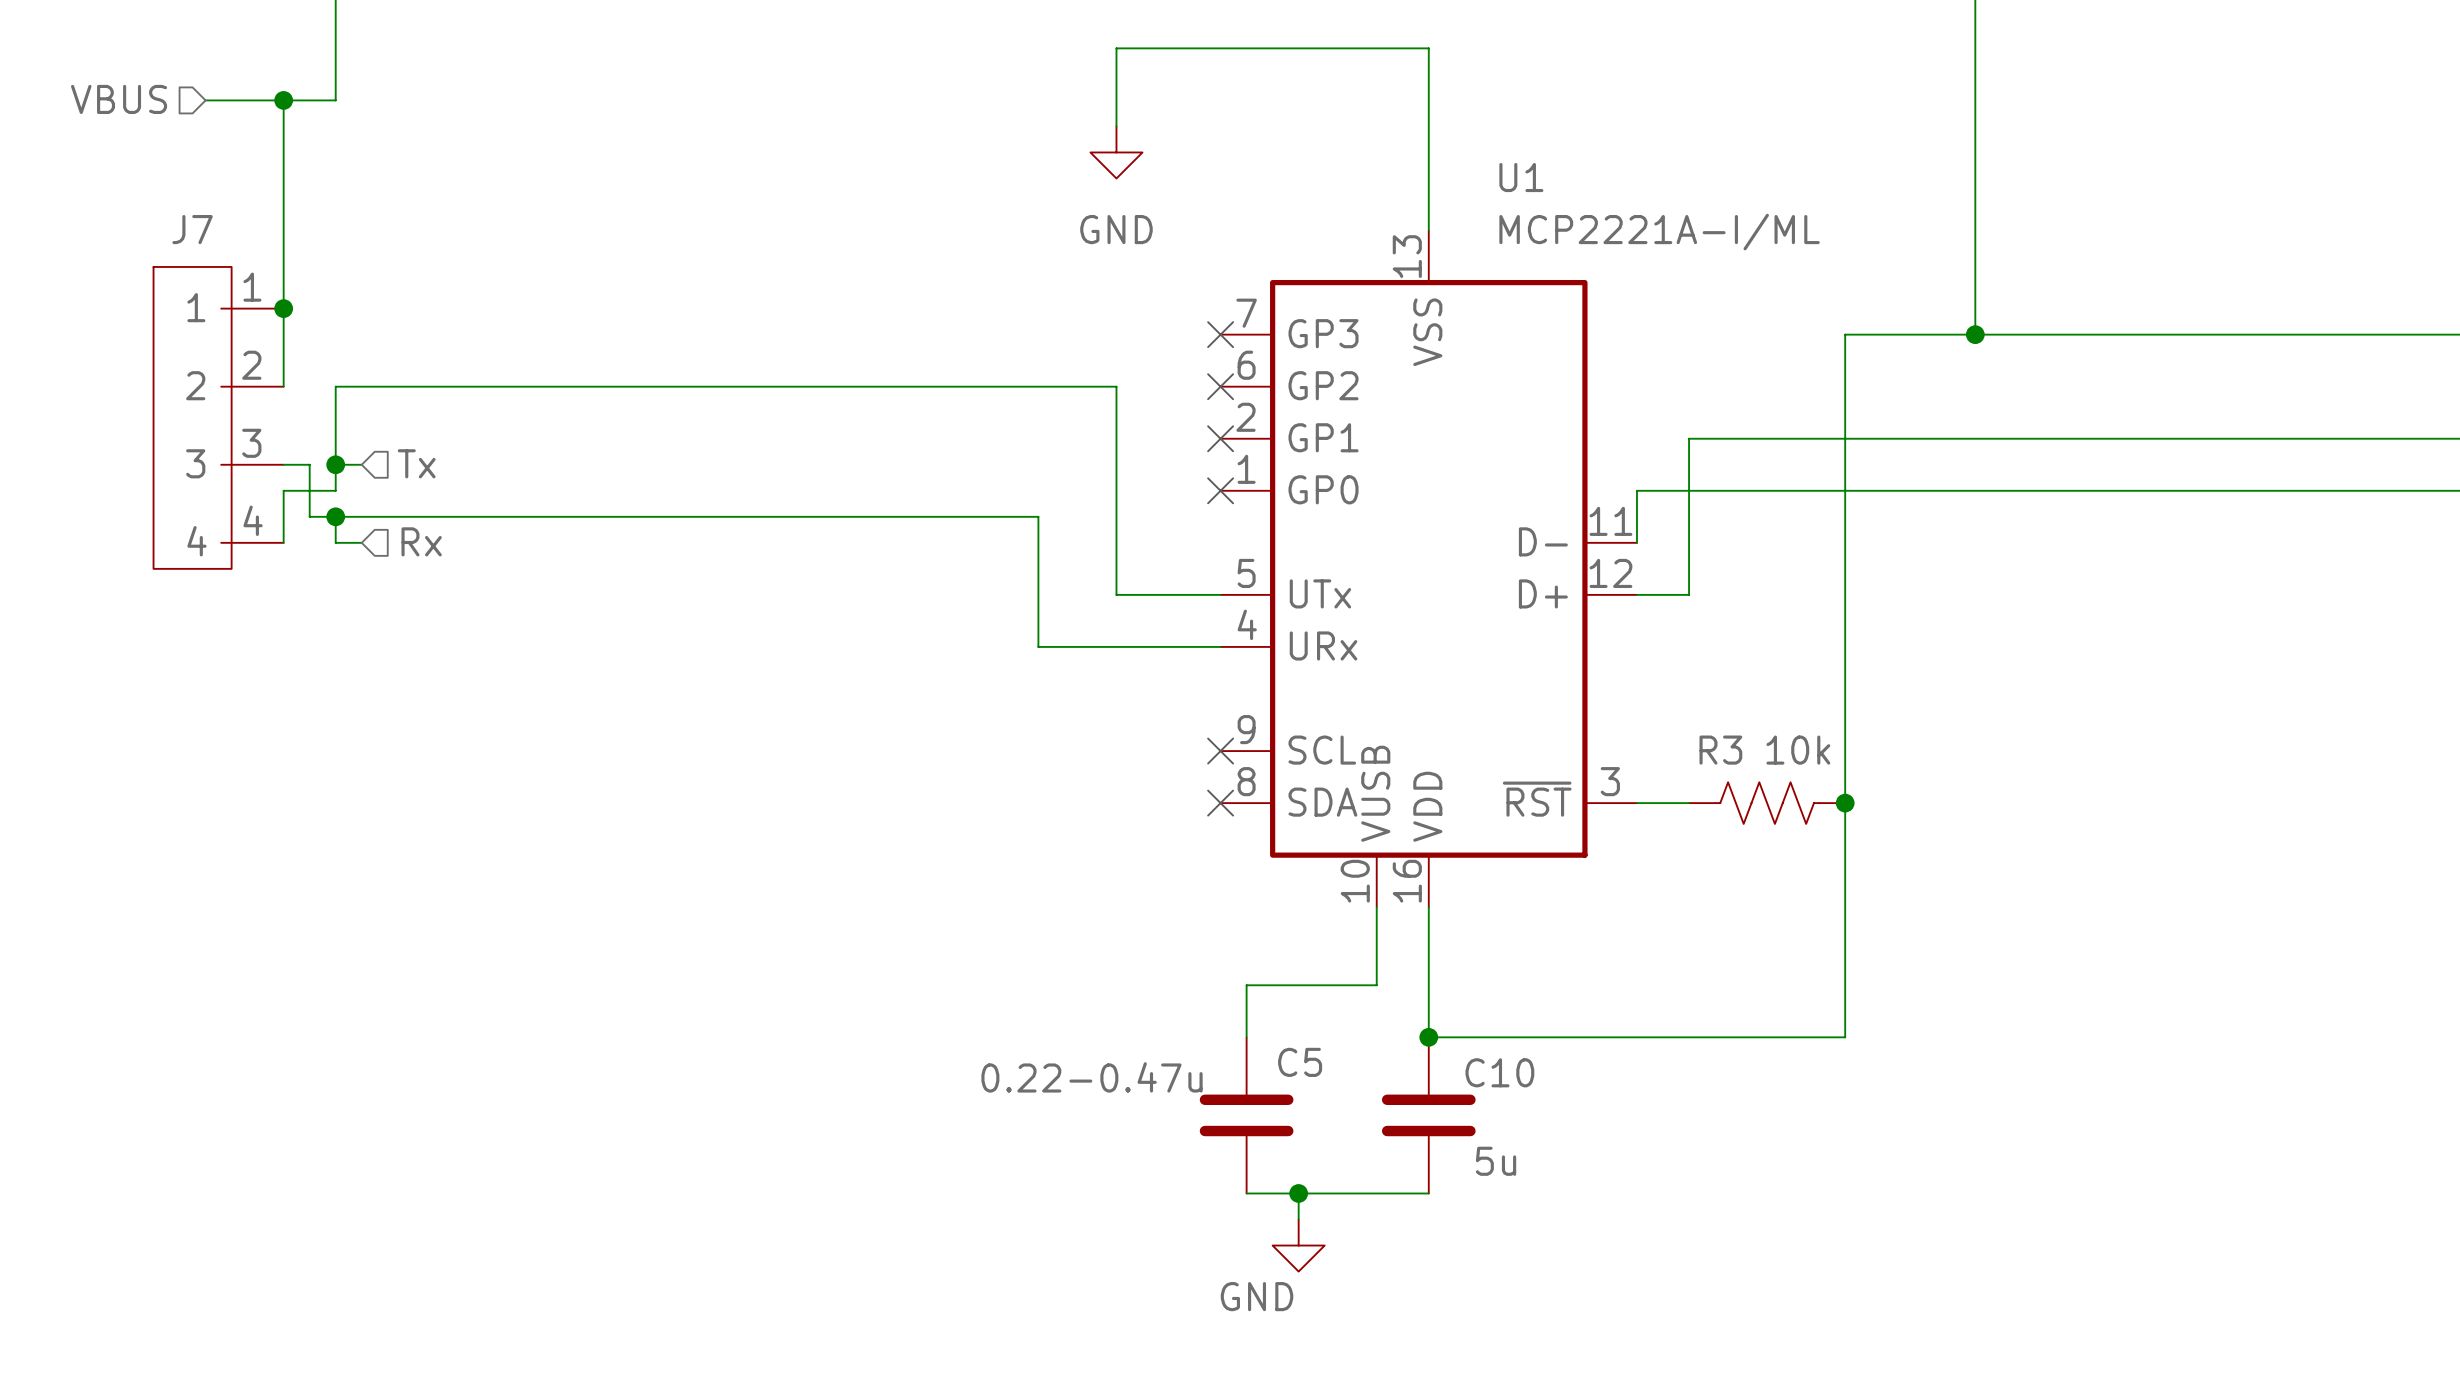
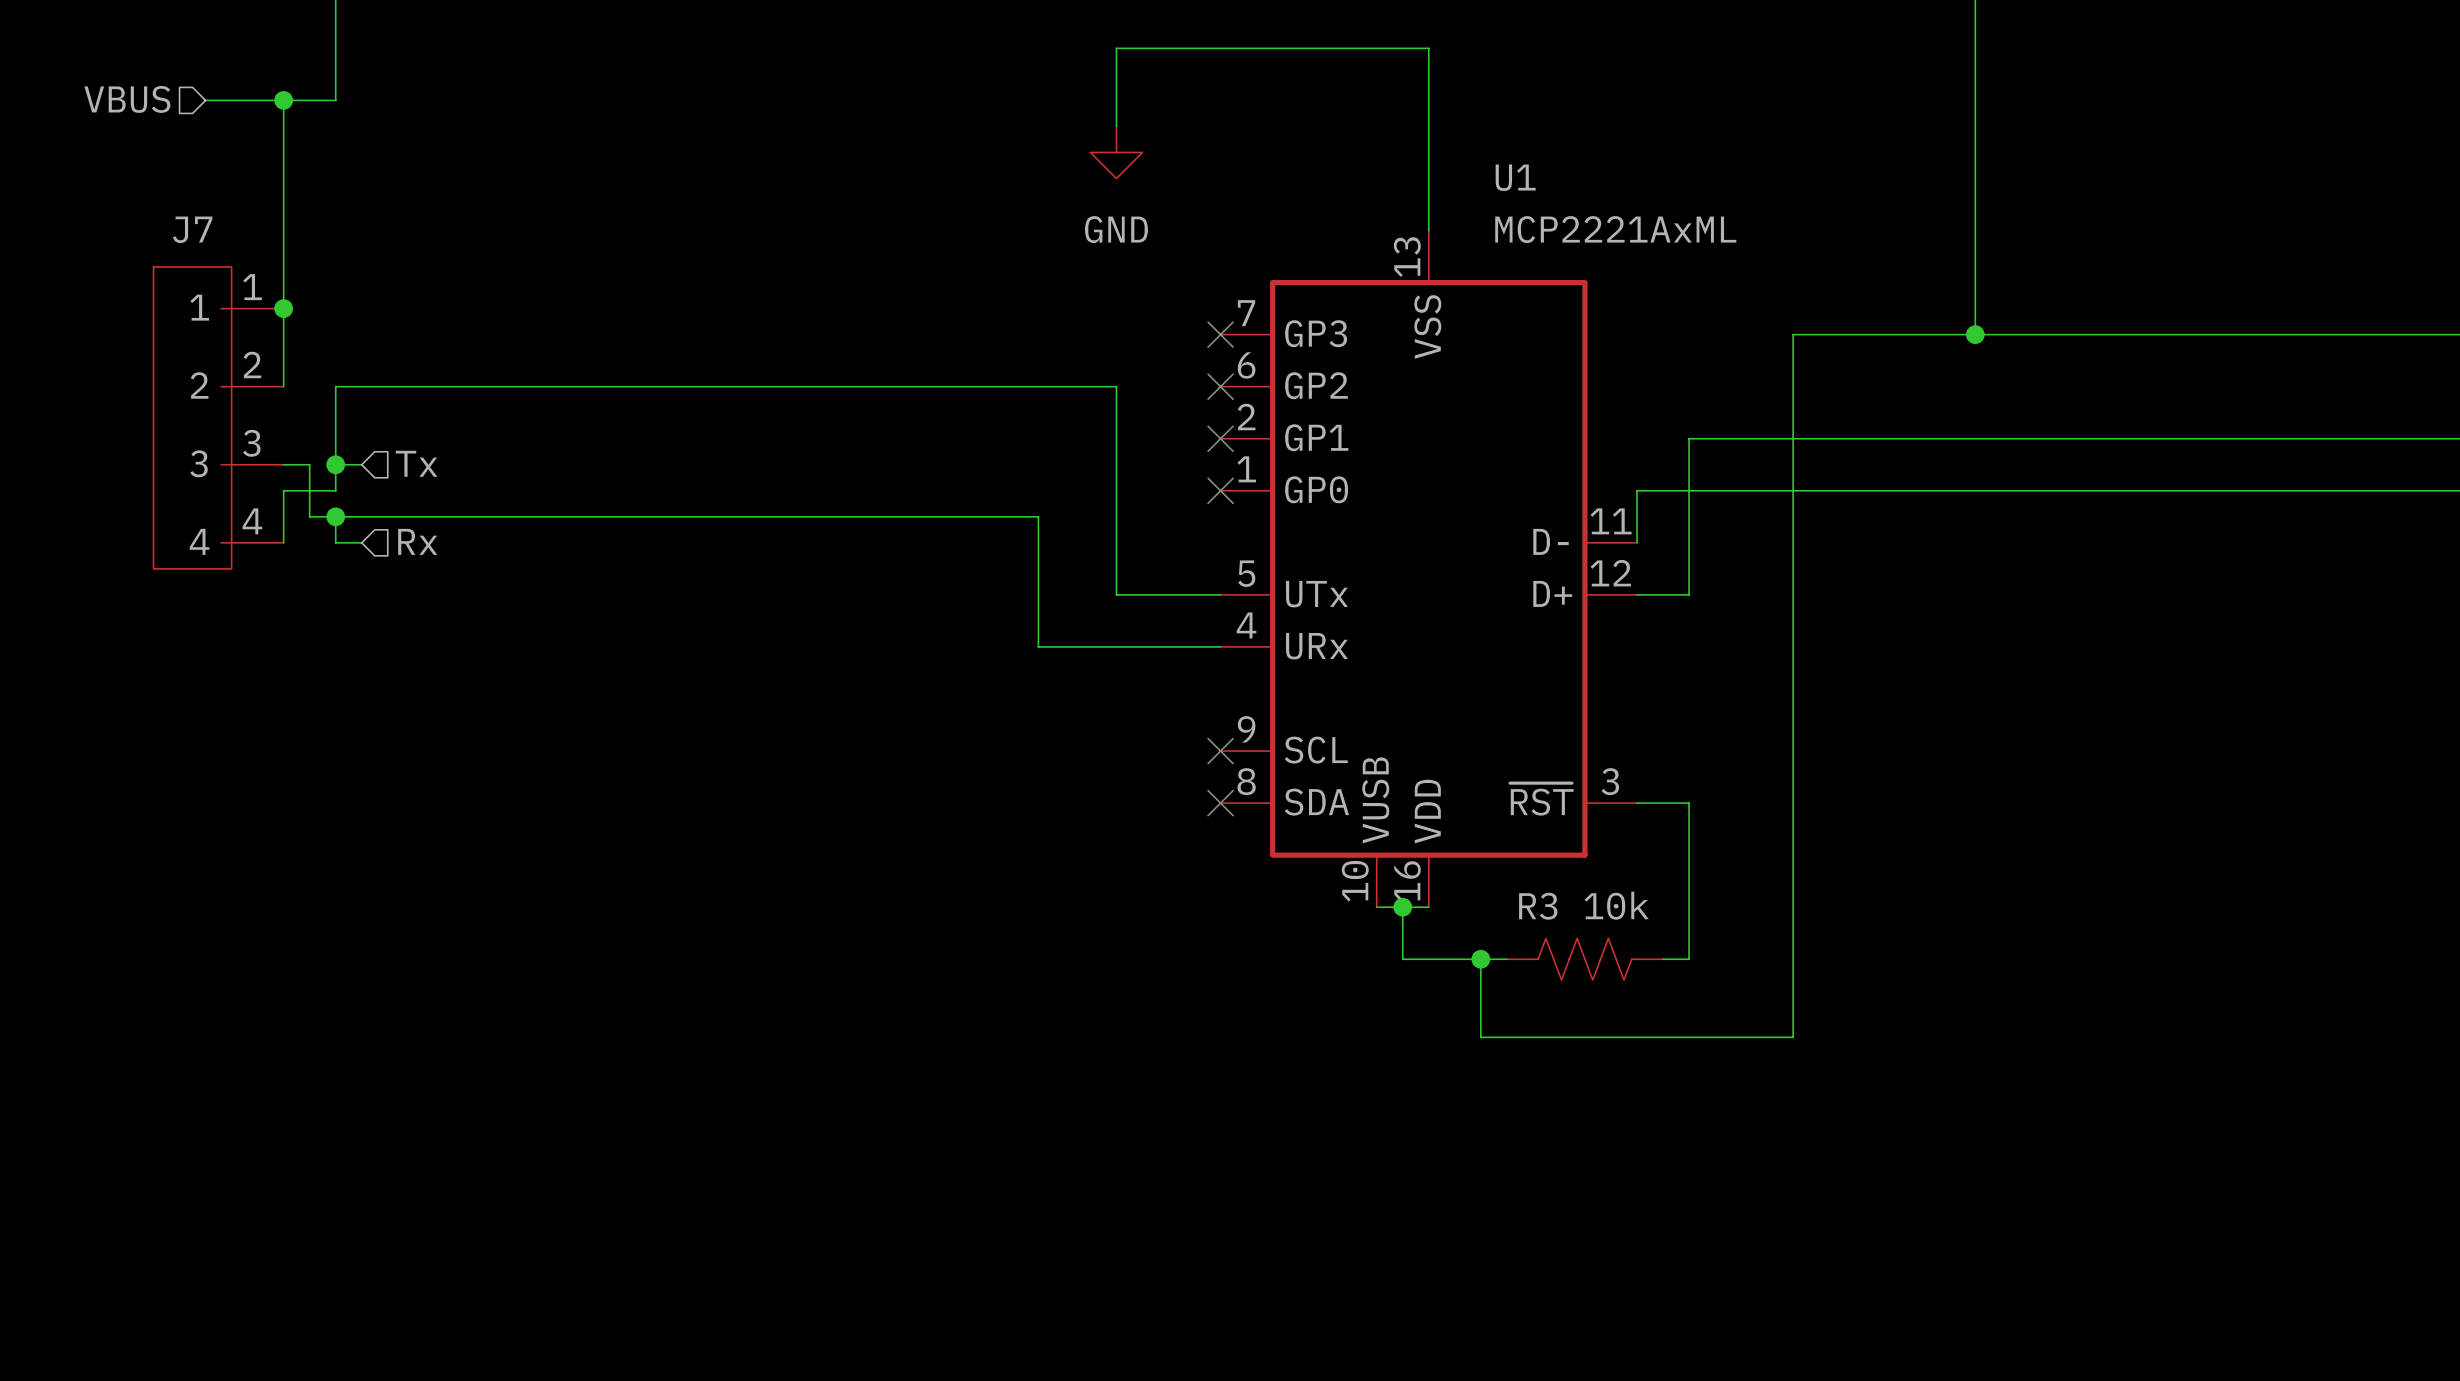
U1 value: MCP2221A-I/ML (1659, 232) -> MCP2221AxML (1615, 229)
wire: (1845, 334) (1845, 1037) (1793, 1037) -> (1845, 334) (1793, 334) (1793, 1037)
wire: none -> (1689, 803) (1689, 959) (1663, 959)
R3 position: (1767, 803) -> (1584, 959)
junction: (1845, 803) -> none
wire: (1376, 907) (1376, 985) (1246, 985) (1246, 1037) -> (1376, 907) (1428, 907)
wire: none -> (1402, 907) (1402, 959) (1506, 959)
junction: none -> (1402, 907)
wire: (1428, 907) (1428, 1037) (1480, 1037) -> (1480, 959) (1480, 1037)
junction: none -> (1480, 959)
junction: (1428, 1037) -> none
C5: 0.22-0.47u (1246, 1115) -> none
C10: 5u (1428, 1115) -> none
wire: (1246, 1193) (1428, 1193) -> none
wire: (1298, 1193) (1298, 1219) -> none
junction: (1298, 1193) -> none
power symbol: GND (1298, 1245) -> none

